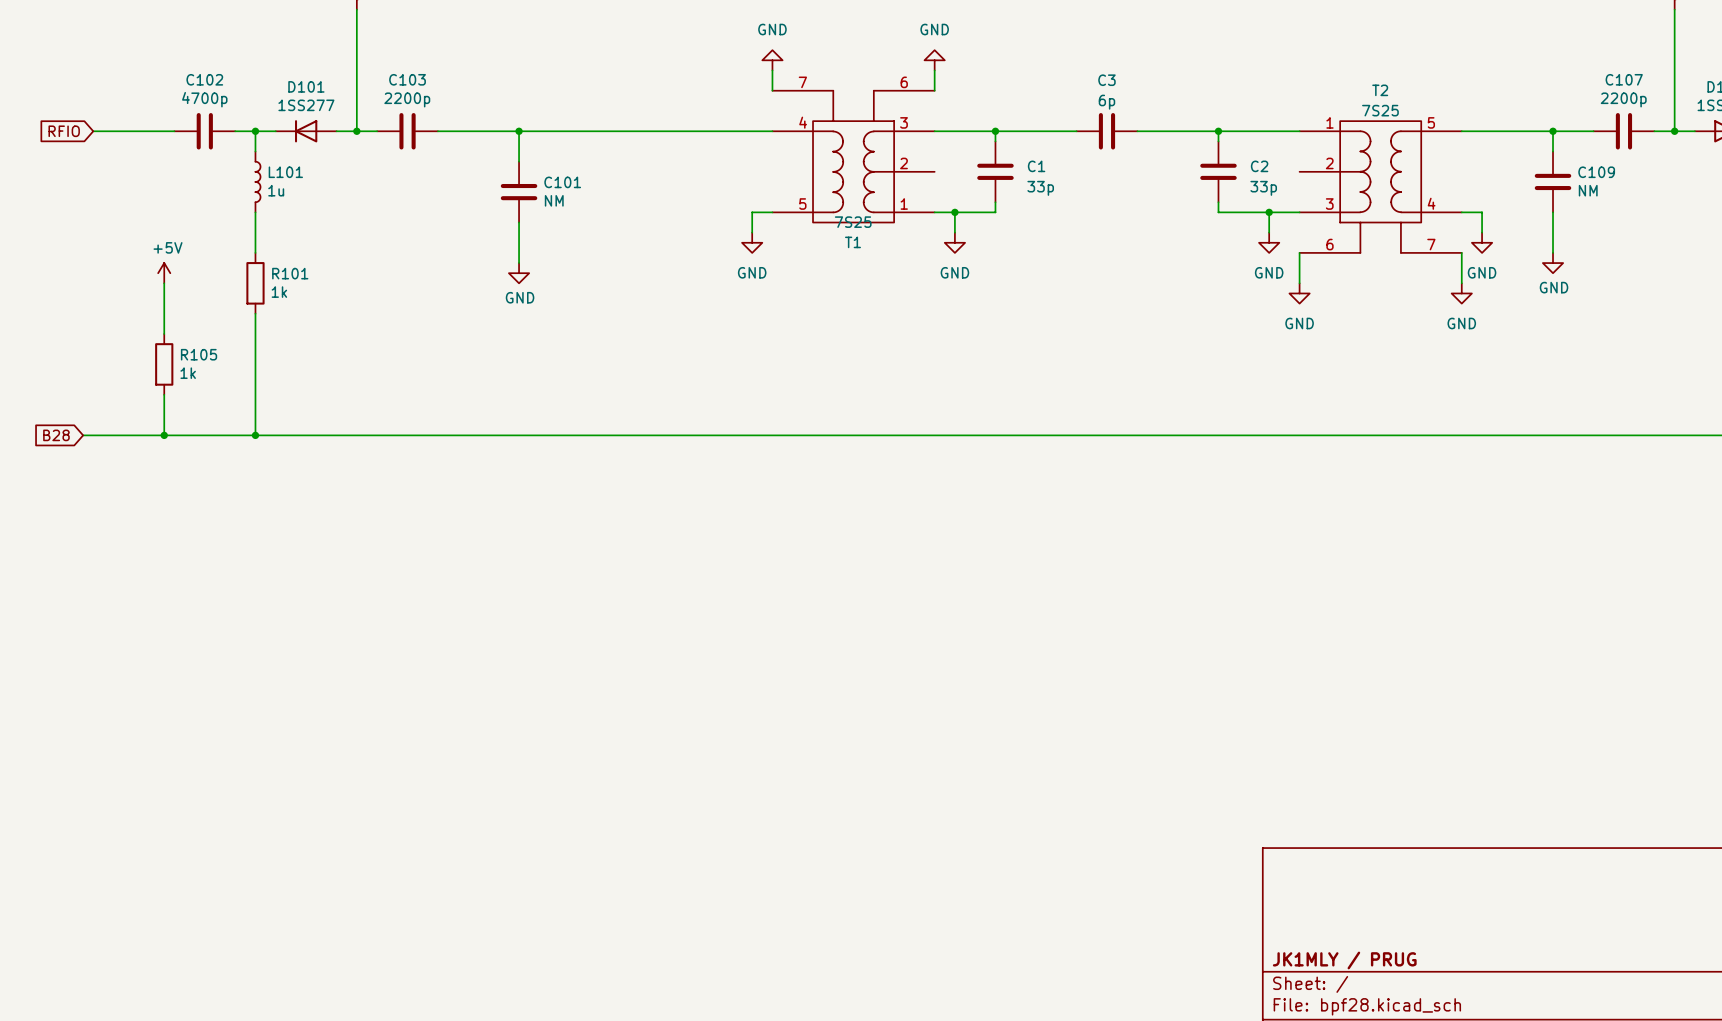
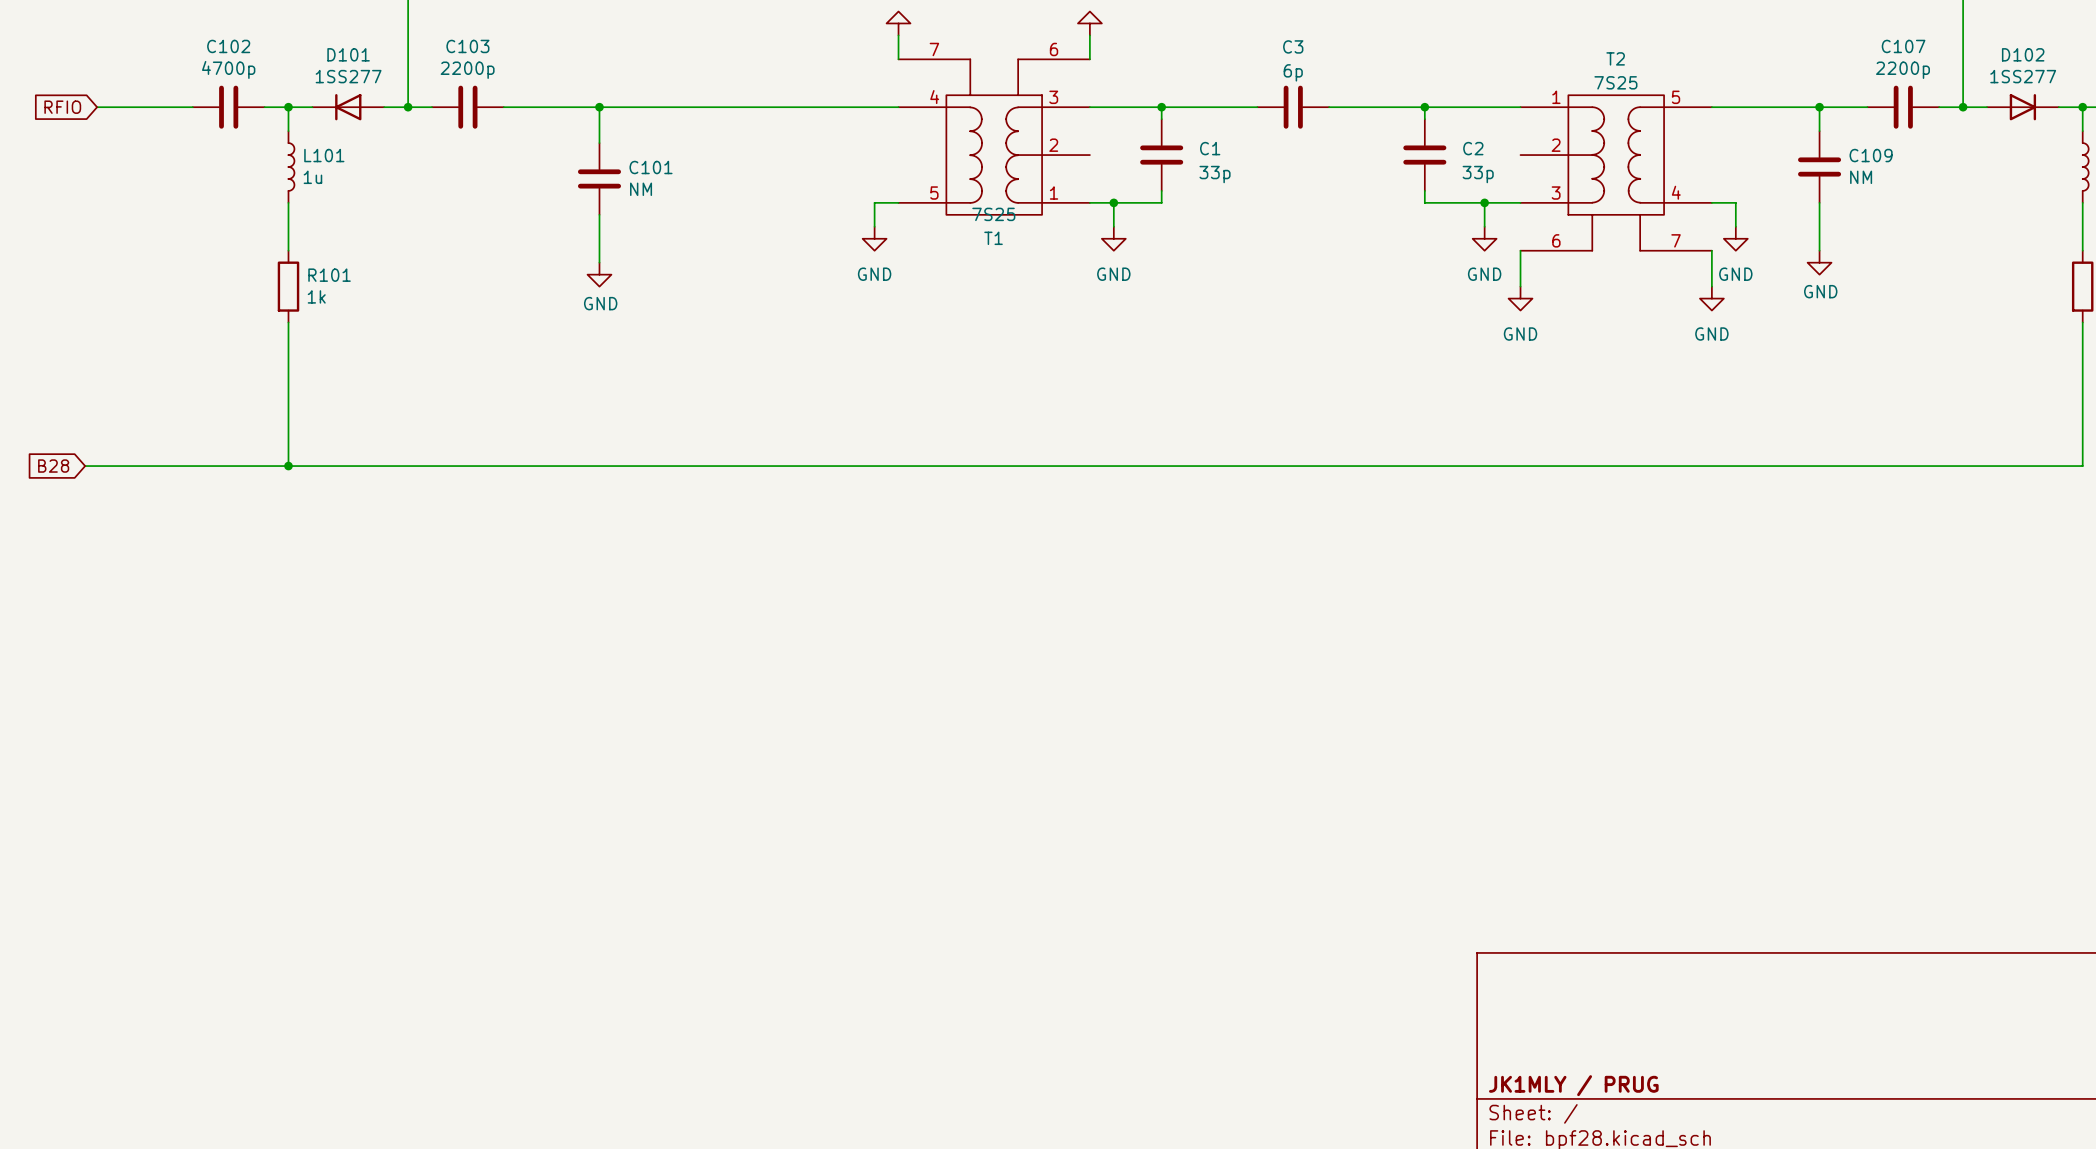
power symbol: +5V (164, 273) -> none
wire: (164, 283) (164, 334) -> none
R105: 1k (164, 364) -> none
wire: (164, 394) (164, 435) -> none
junction: (164, 435) -> none

